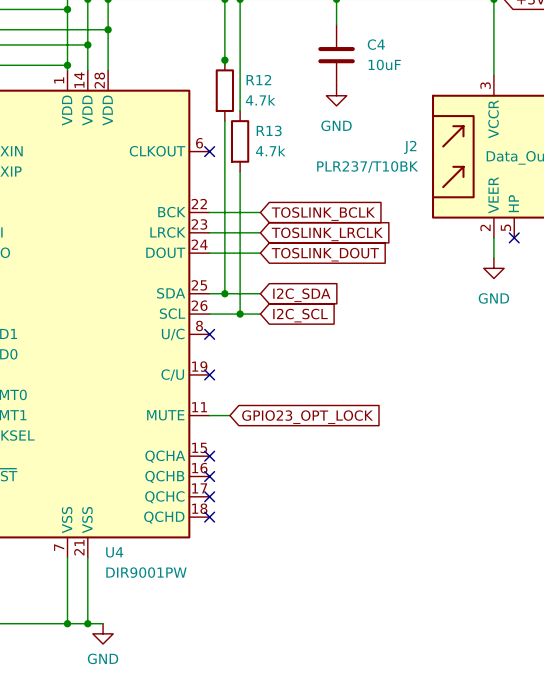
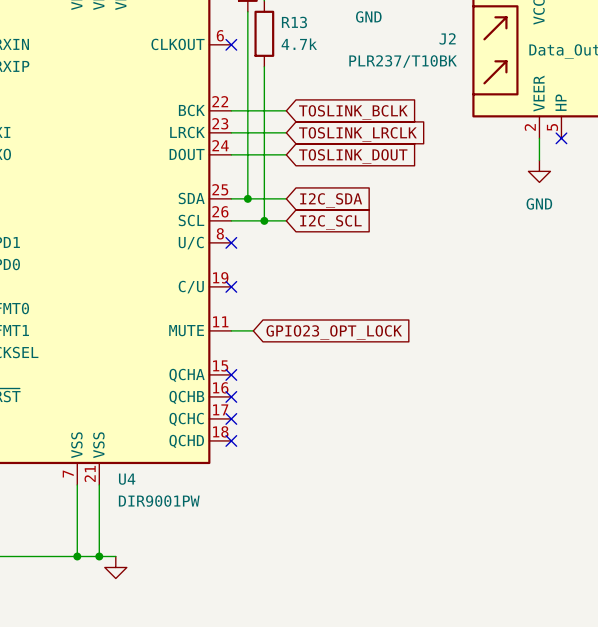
power symbol text: GND (103, 658) -> none

